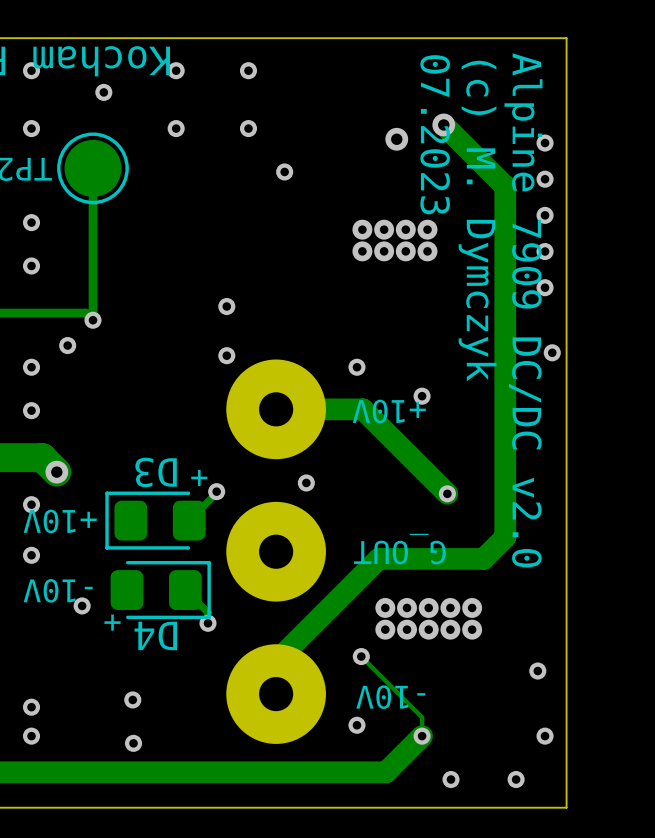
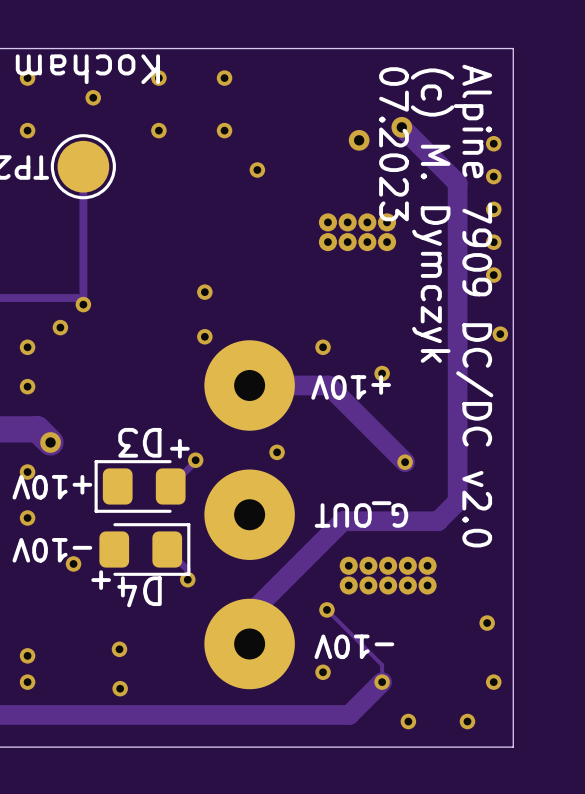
via: (31, 222) -> none
via: (31, 265) -> none

